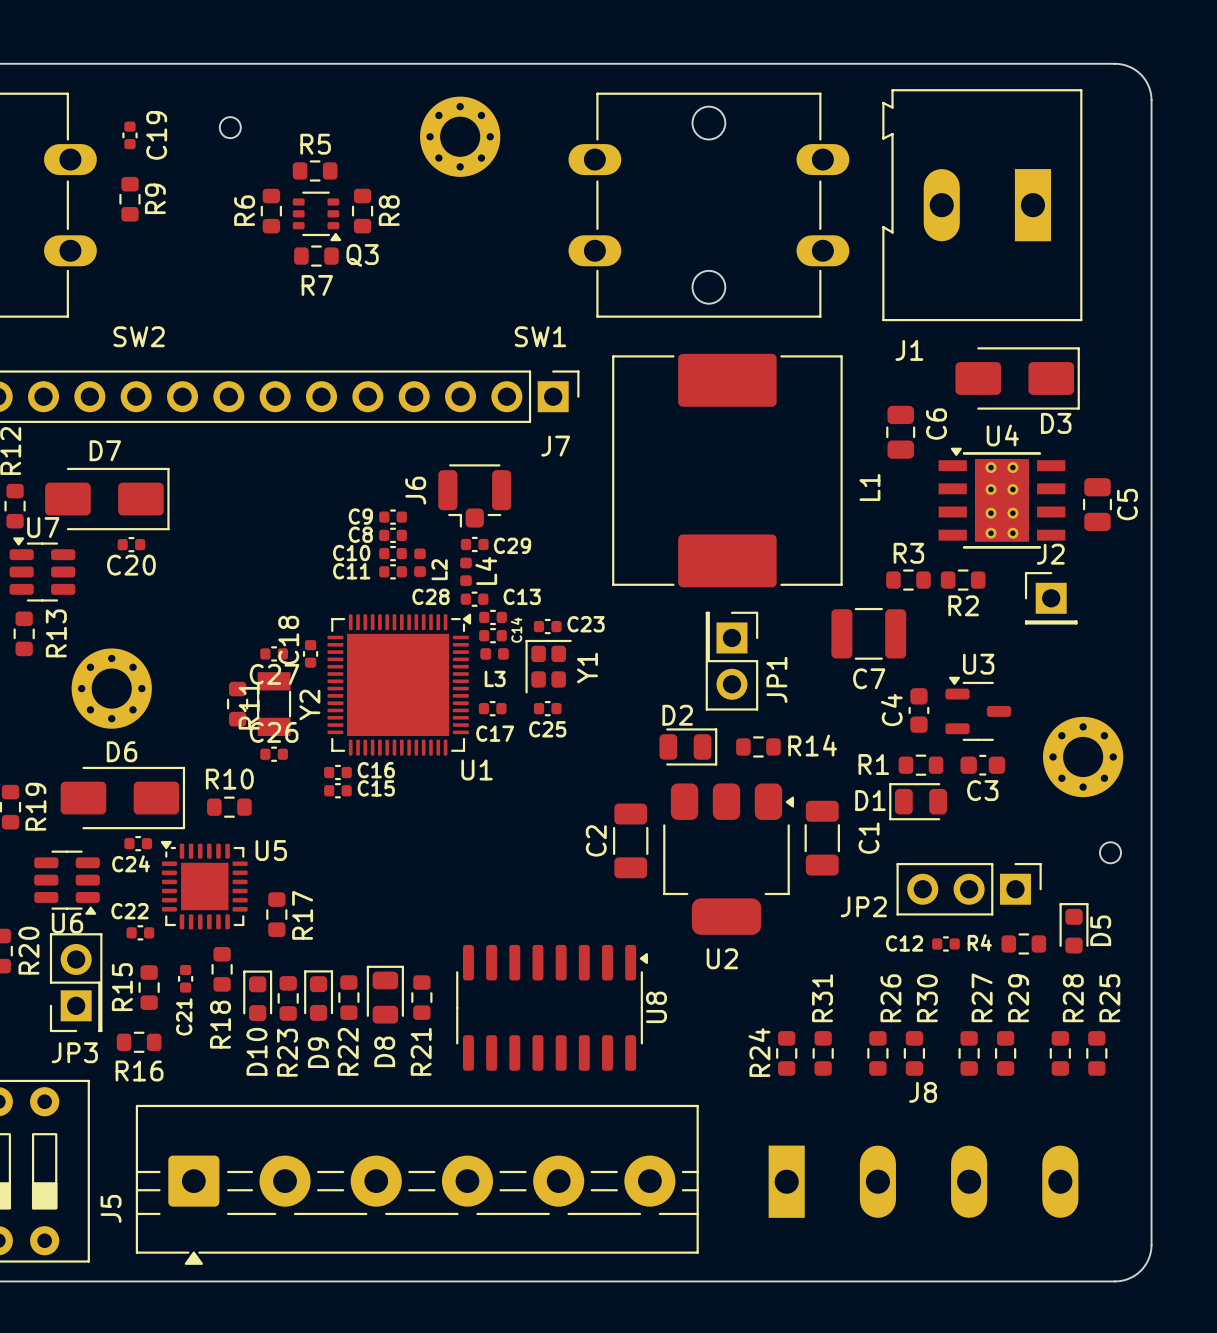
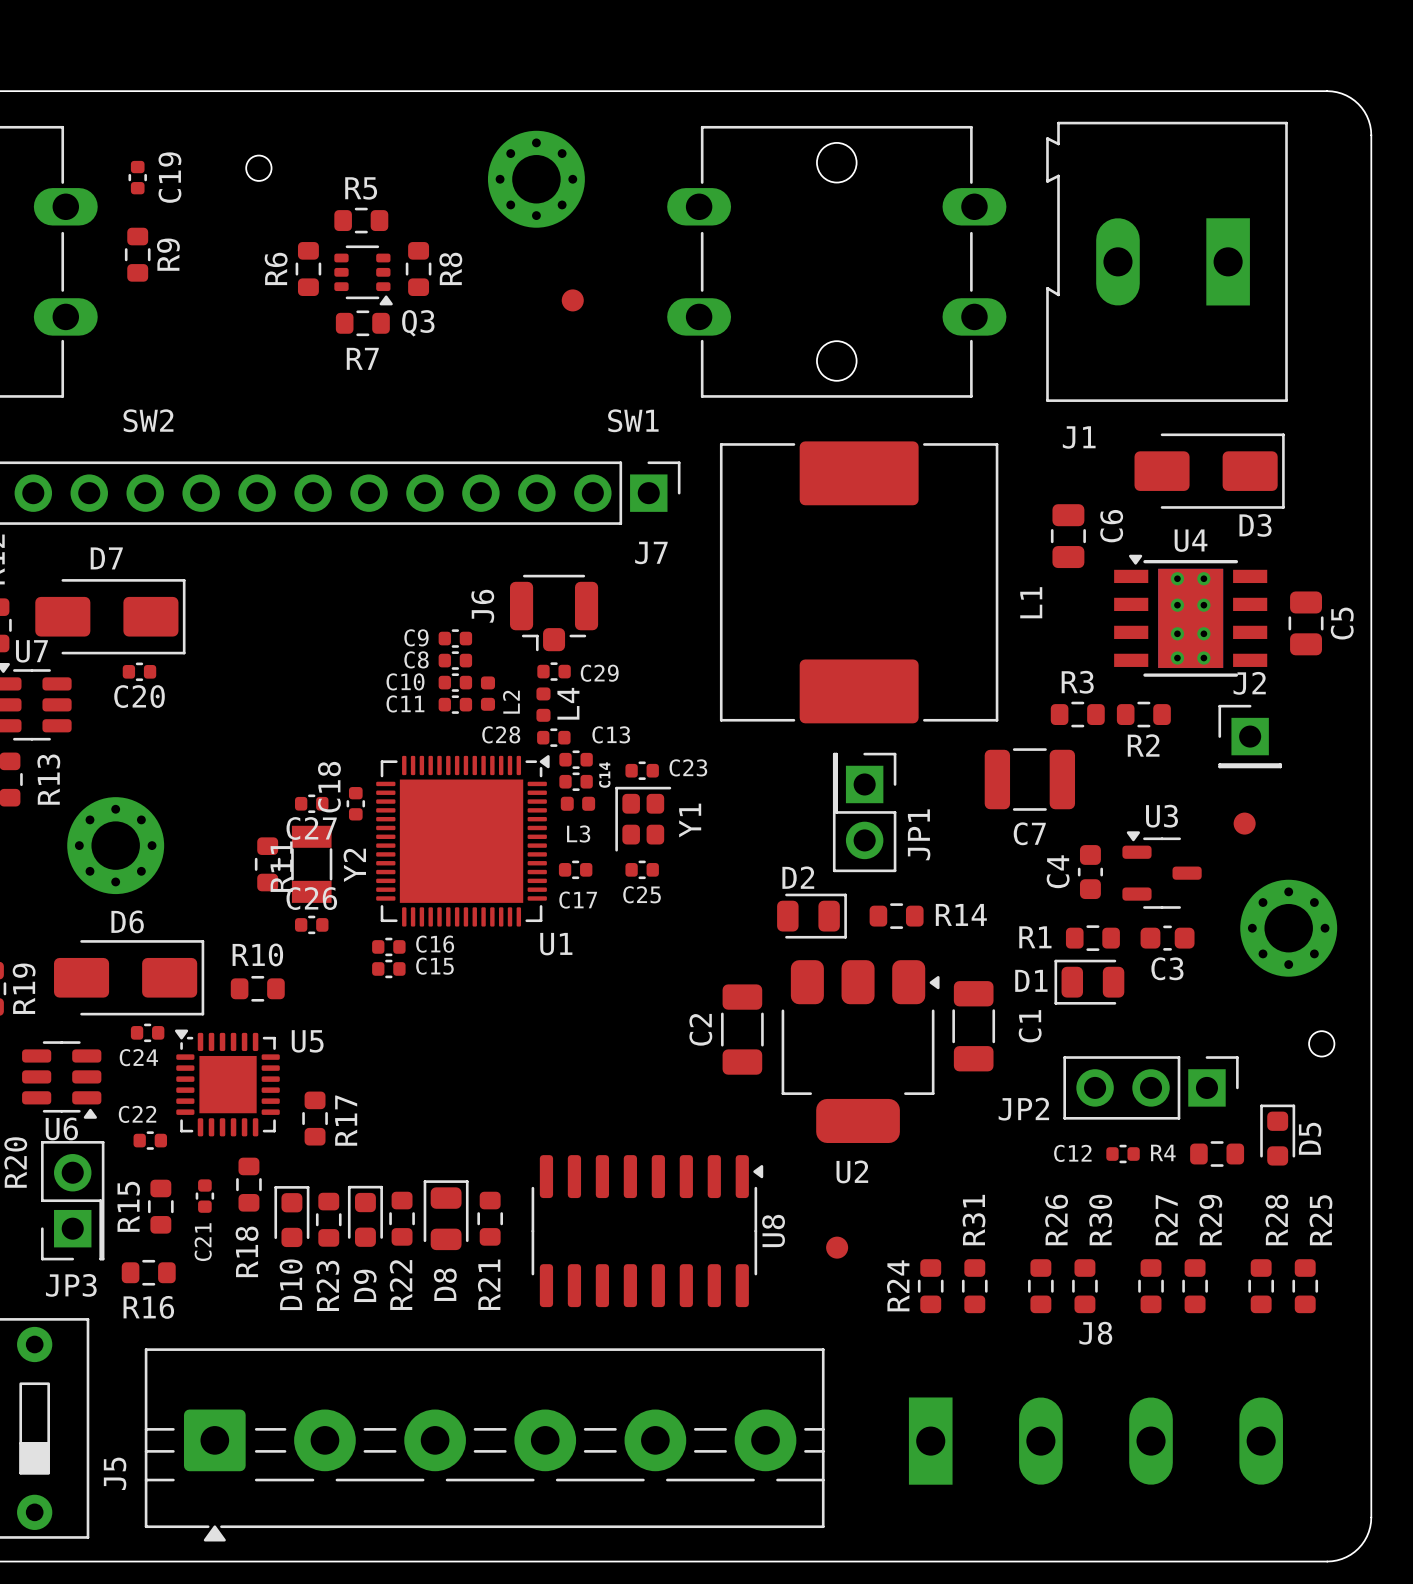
part: none -> (572, 300)
part: none -> (1244, 823)
part: none -> (837, 1247)

